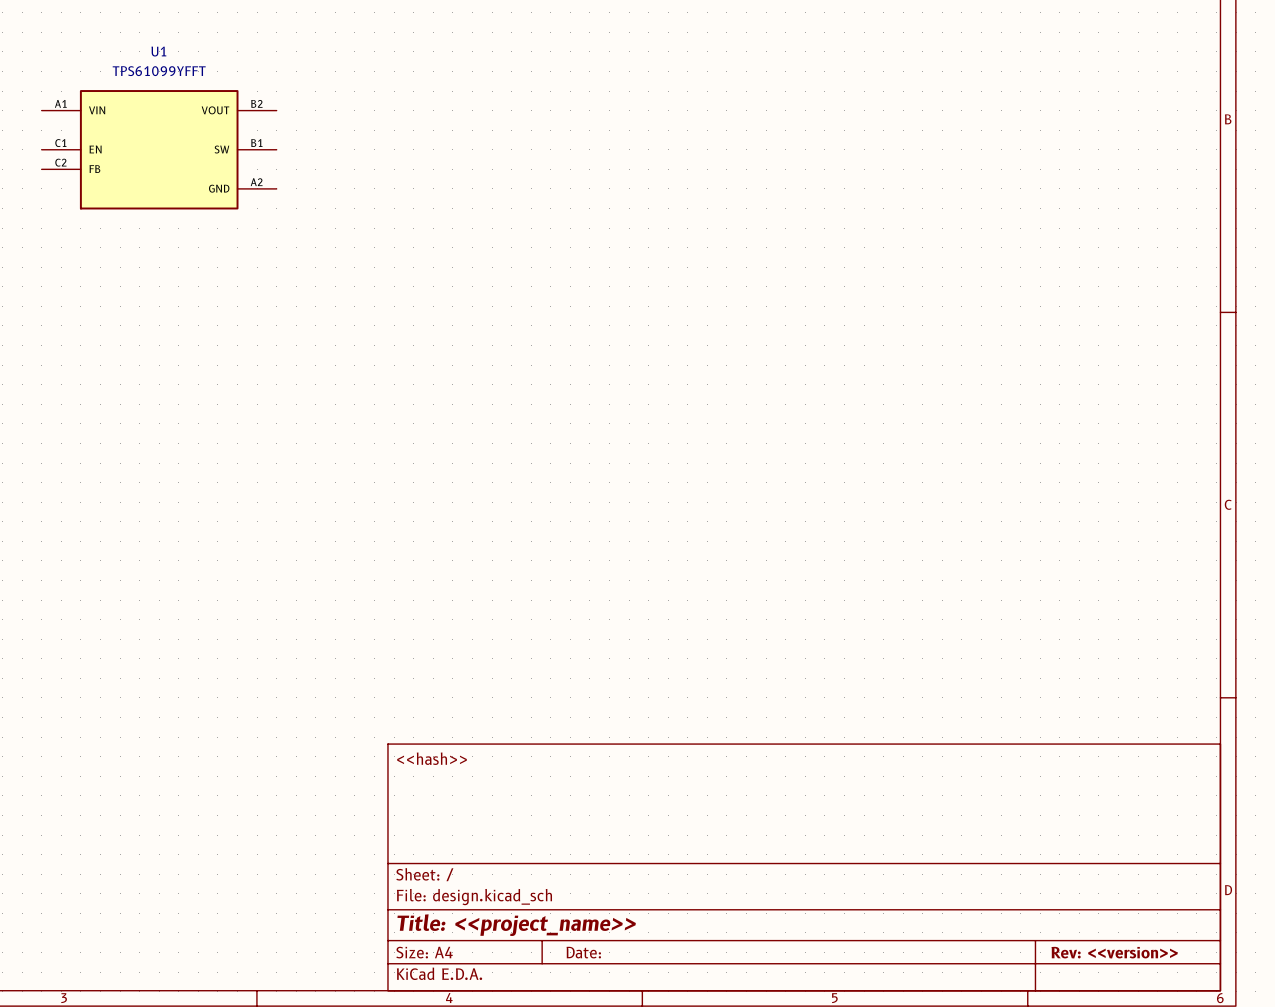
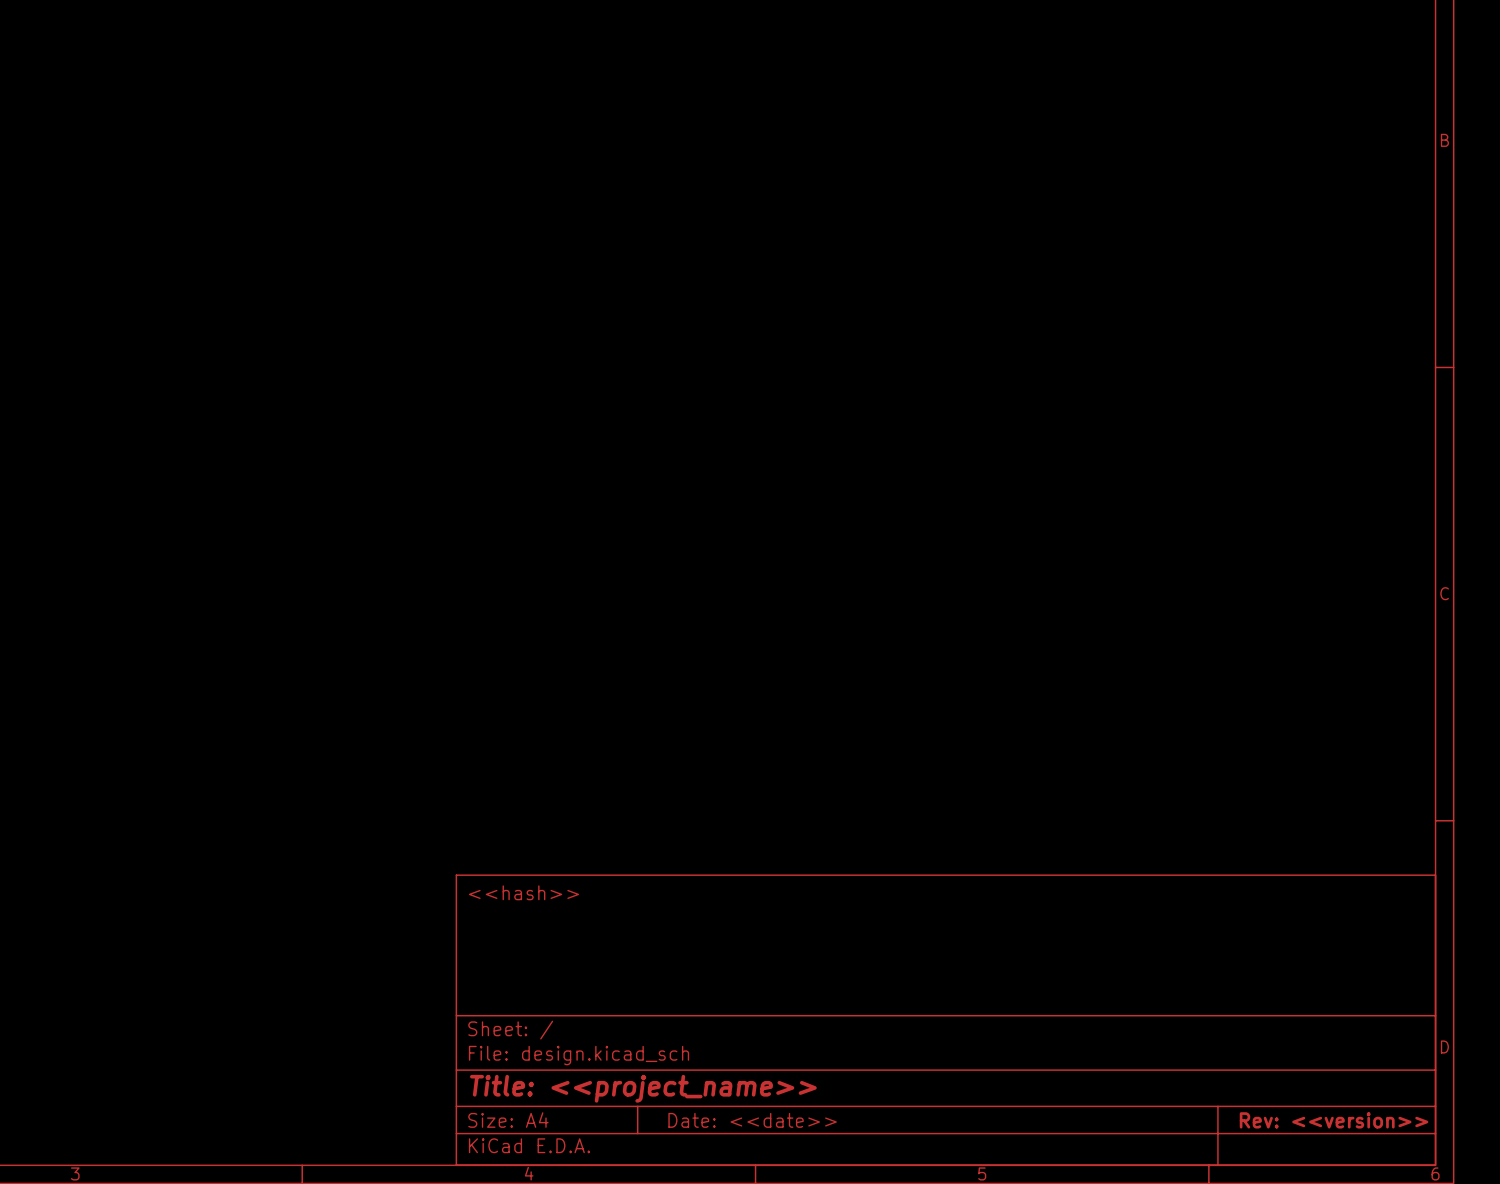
U1: TPS61099YFFT (159, 149) -> none
title block: Date: (583, 952) -> Date: <<date>> (752, 1120)

